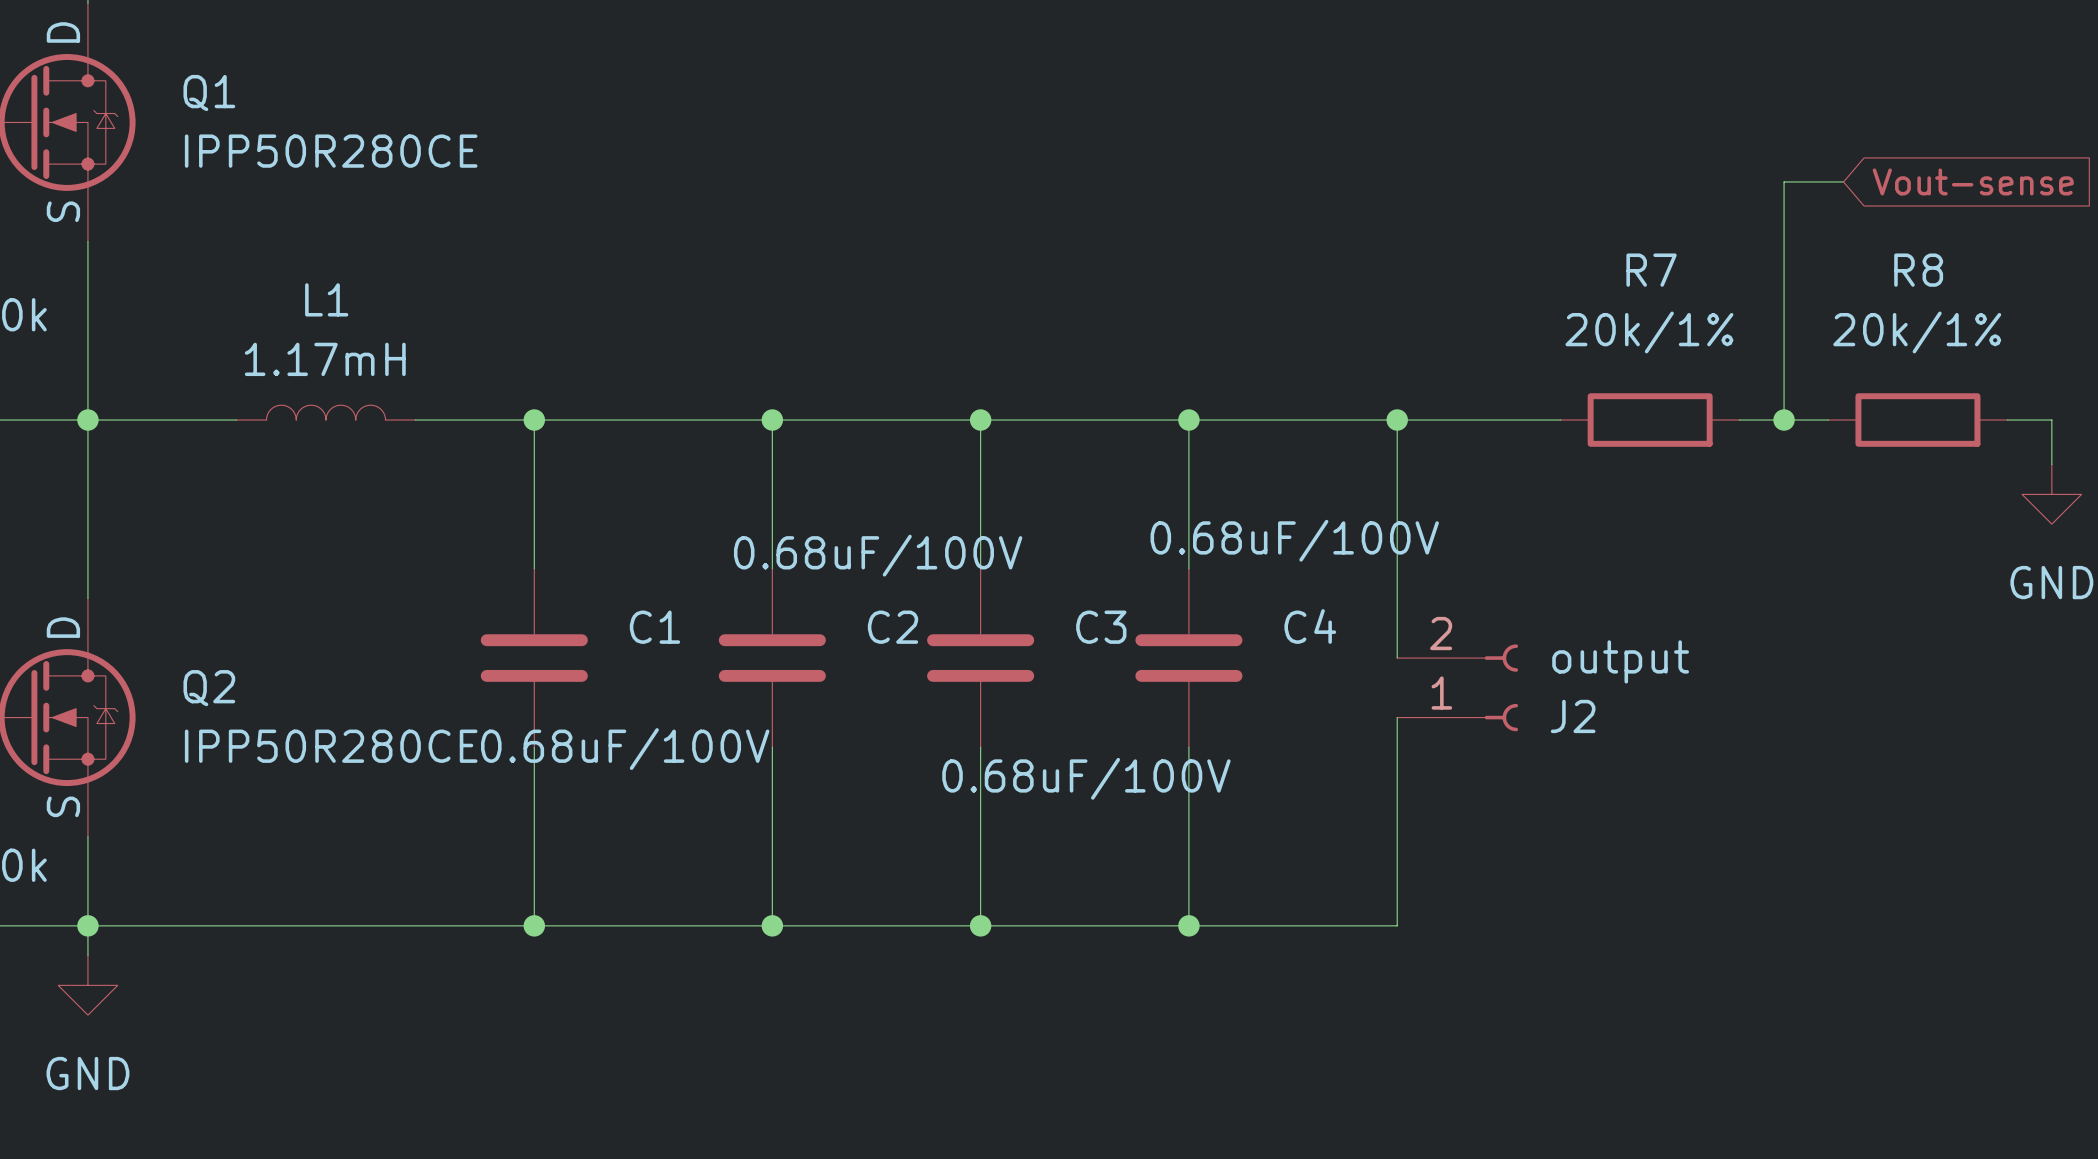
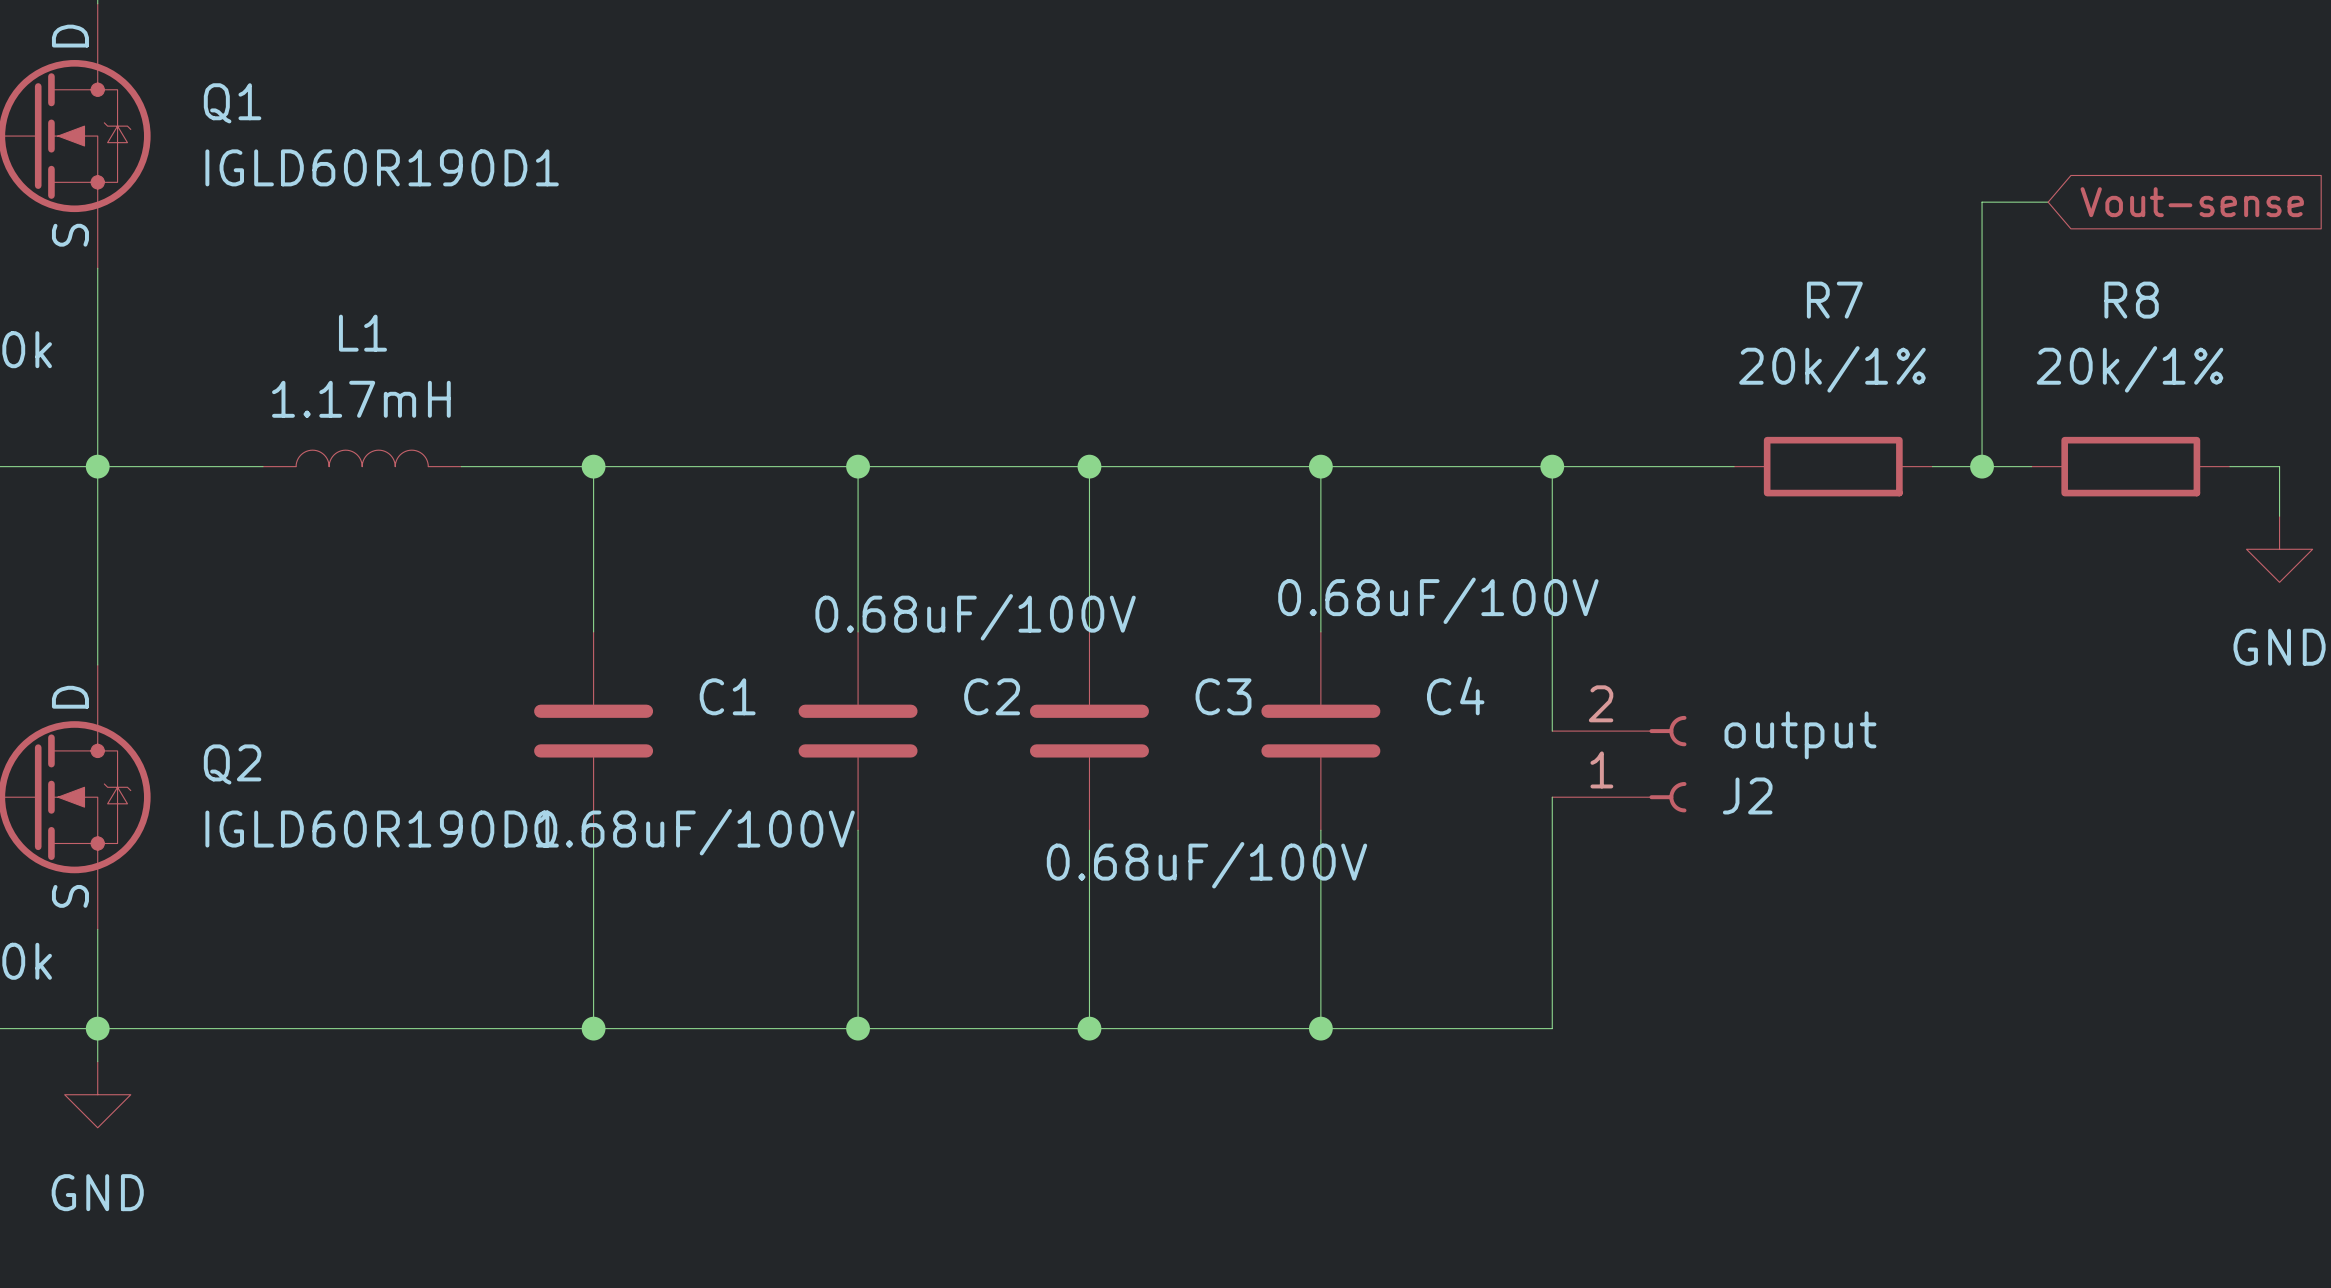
Q1 value: IPP50R280CE (331, 151) -> IGLD60R190D1 (382, 167)
Q2 value: IPP50R280CE (331, 746) -> IGLD60R190D1 (382, 829)

